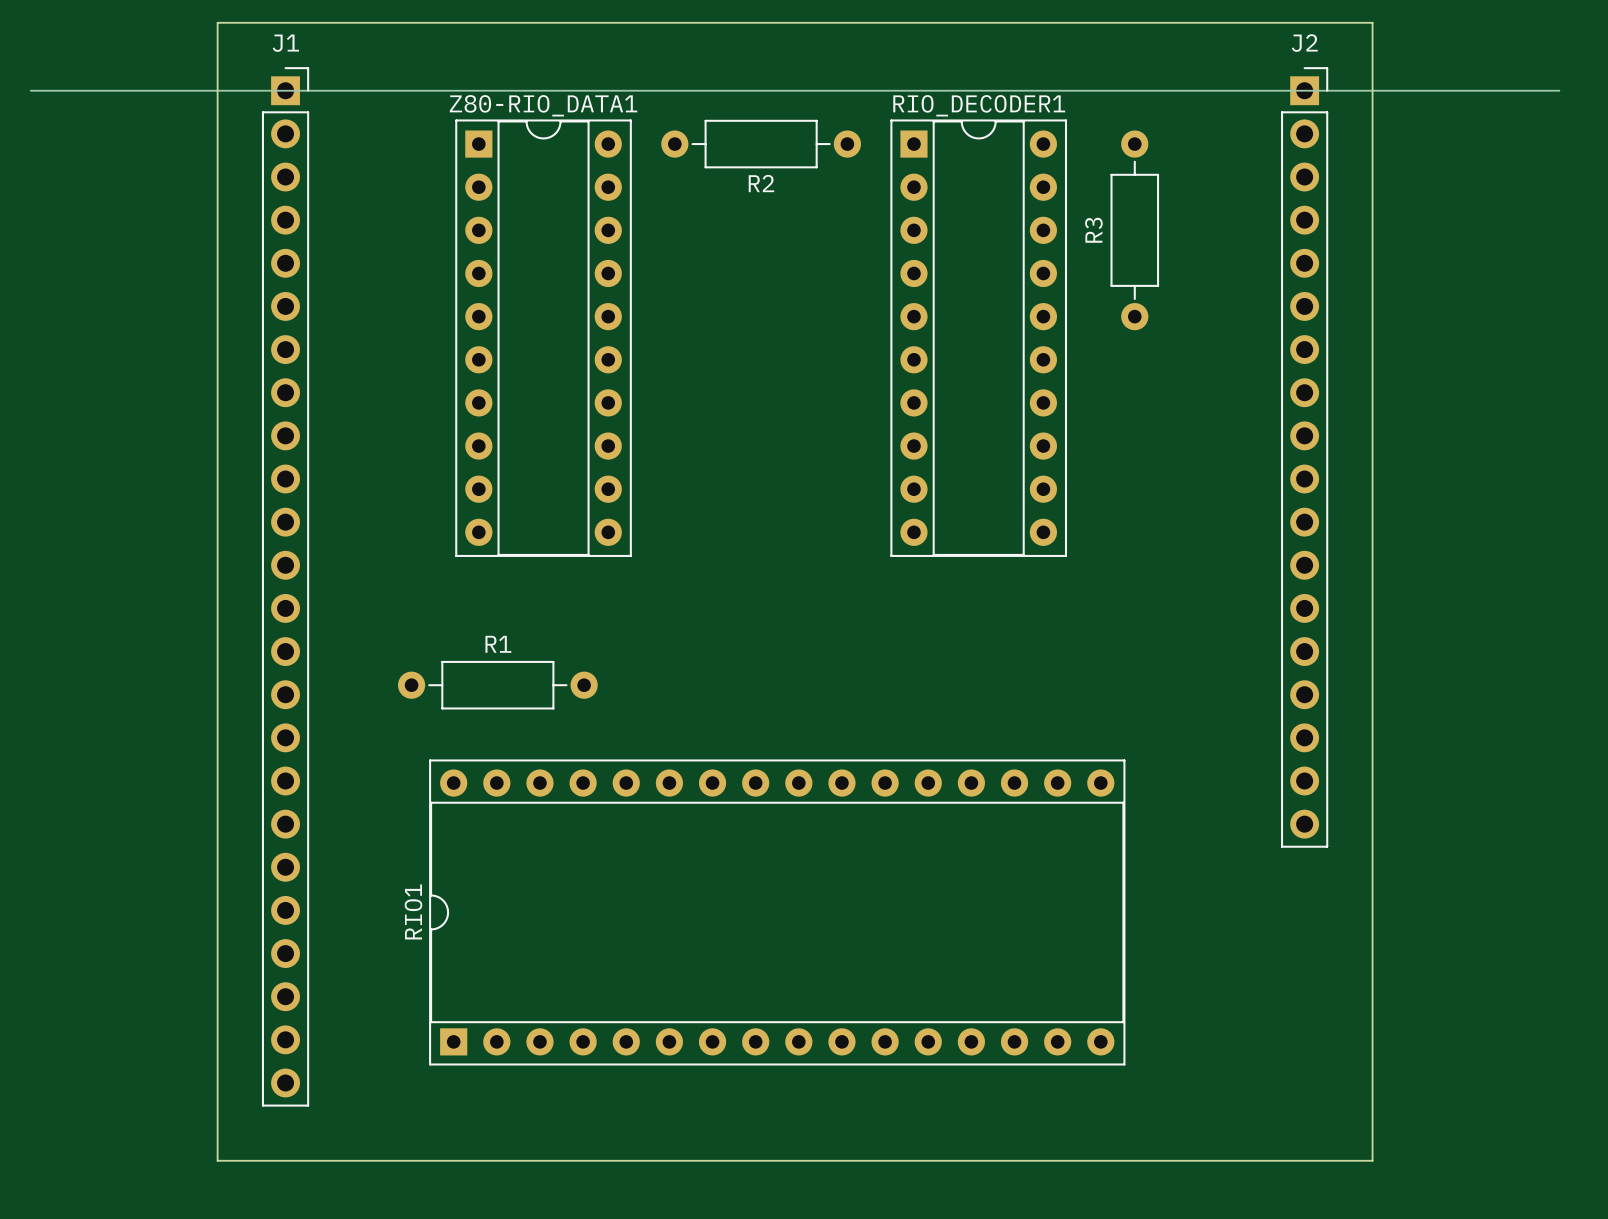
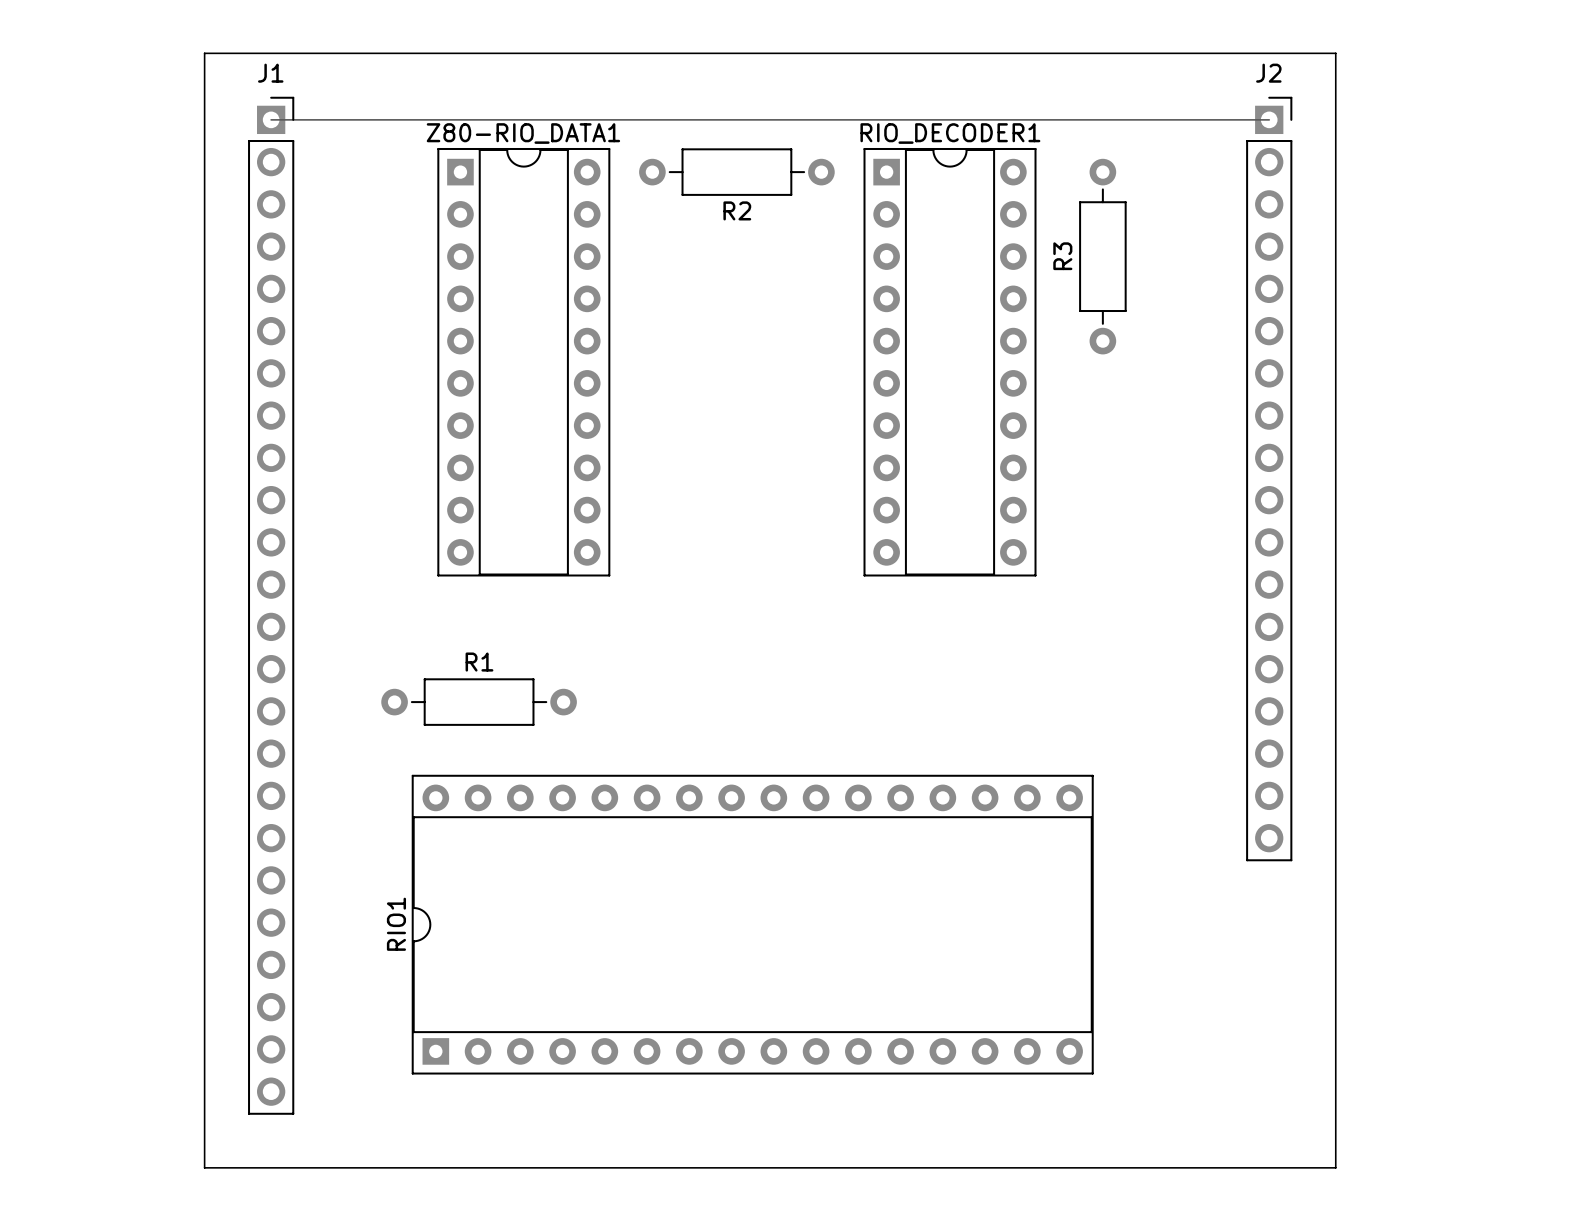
line: (30, 90) (285, 90) -> none
line: (1304, 90) (1559, 90) -> none

